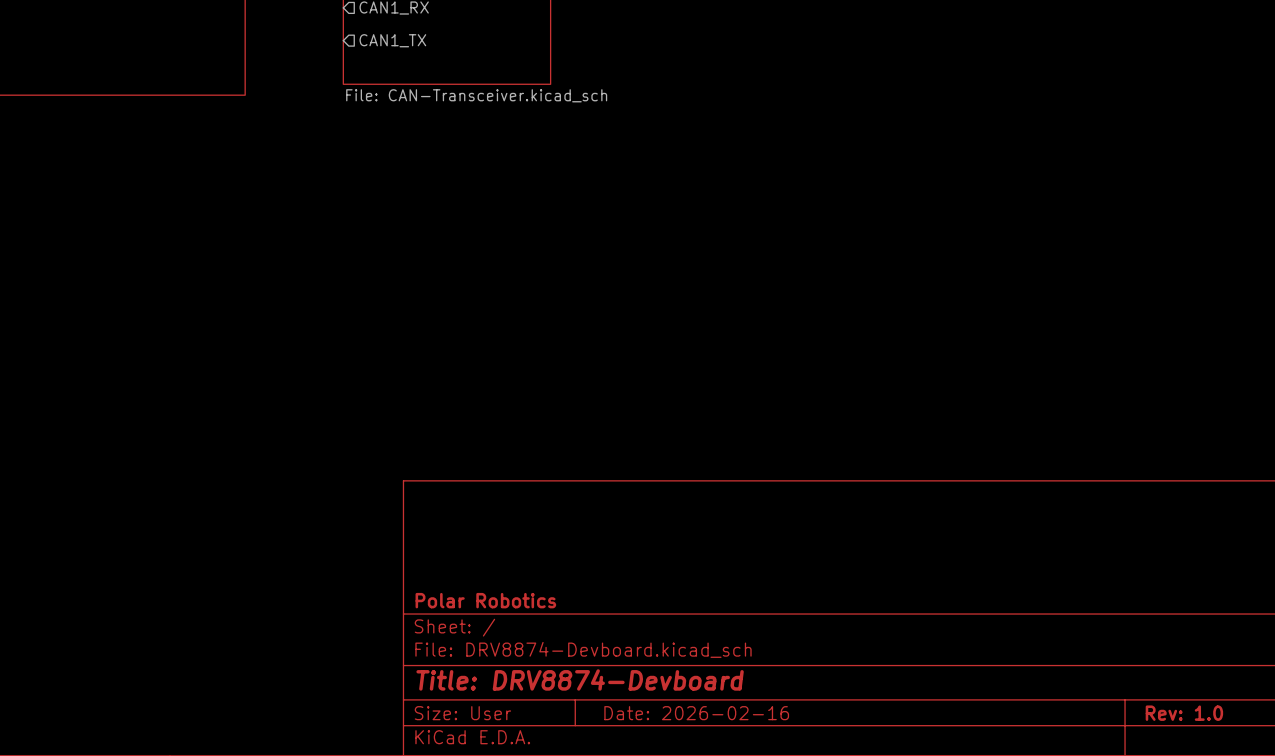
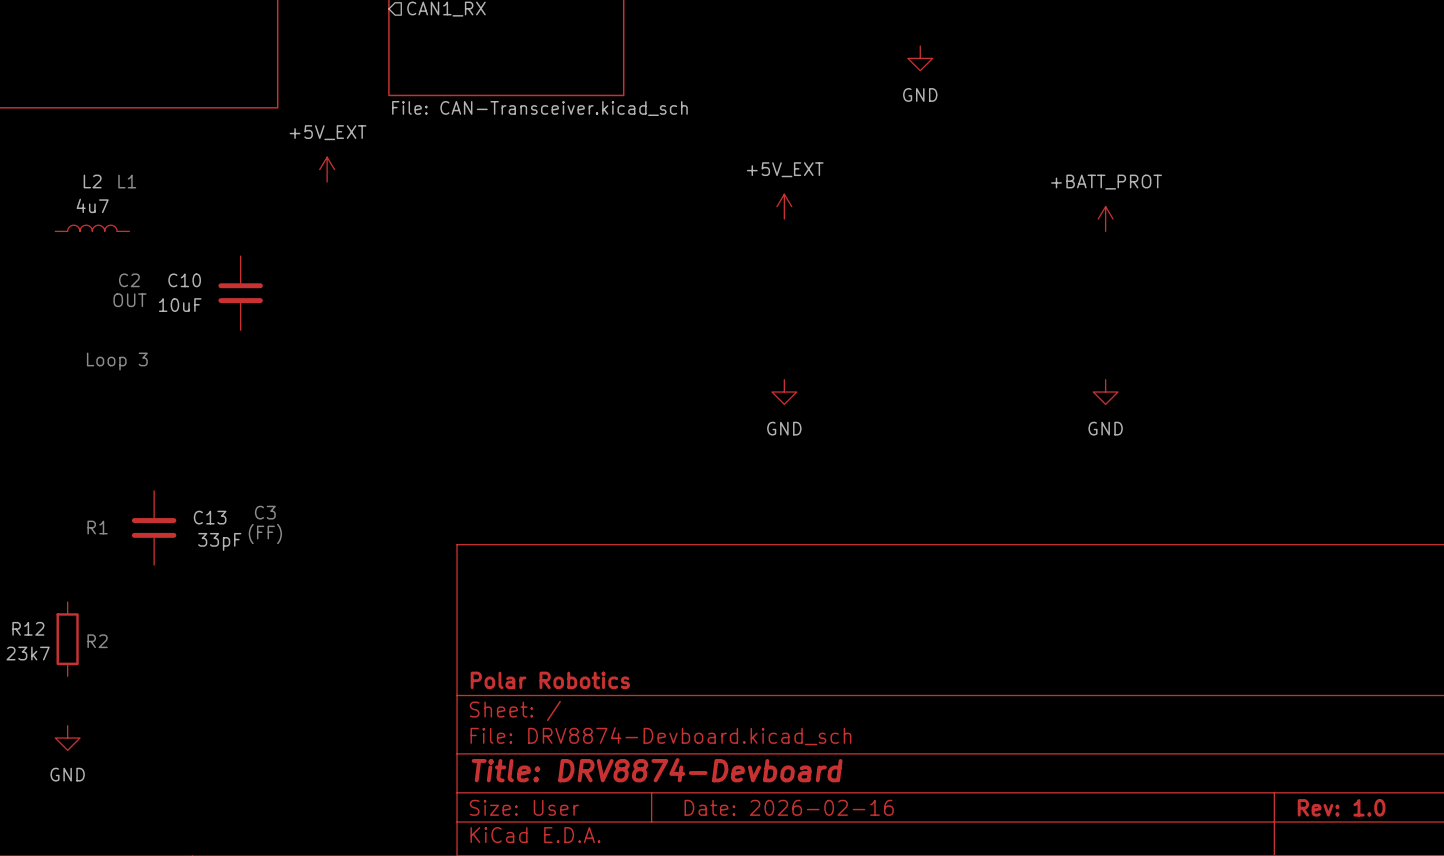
hierarchical label: CAN1_TX (392, 40) -> none
power symbol: none -> GND (920, 58)
power symbol: none -> +5V_EXT (327, 169)
text: none -> L1 (127, 181)
power symbol: none -> +5V_EXT (784, 206)
power symbol: none -> +BATT_PROT (1105, 219)
L2: none -> 4u7 (92, 228)
text: none -> C2 (129, 280)
C10: none -> 10uF (240, 293)
text: none -> OUT (130, 300)
text: none -> Loop 3 (117, 361)
power symbol: none -> GND (784, 392)
power symbol: none -> GND (1105, 392)
text: none -> C3 (265, 512)
text: none -> R1 (97, 527)
C13: none -> 33pF (154, 527)
text: none -> (FF) (265, 534)
R12: none -> 23k7 (67, 639)
text: none -> R2 (97, 641)
power symbol: none -> GND (67, 738)

